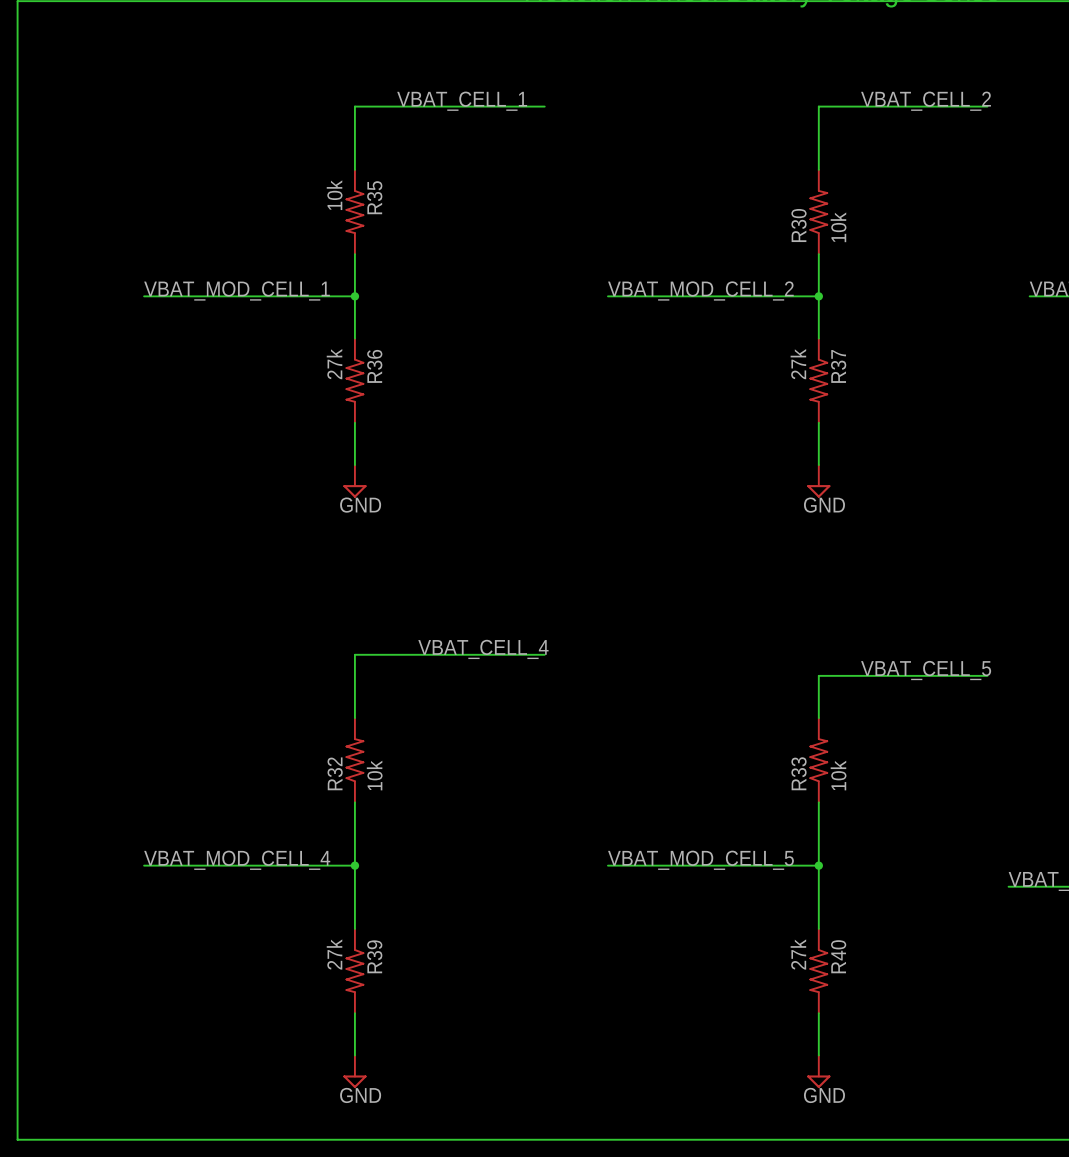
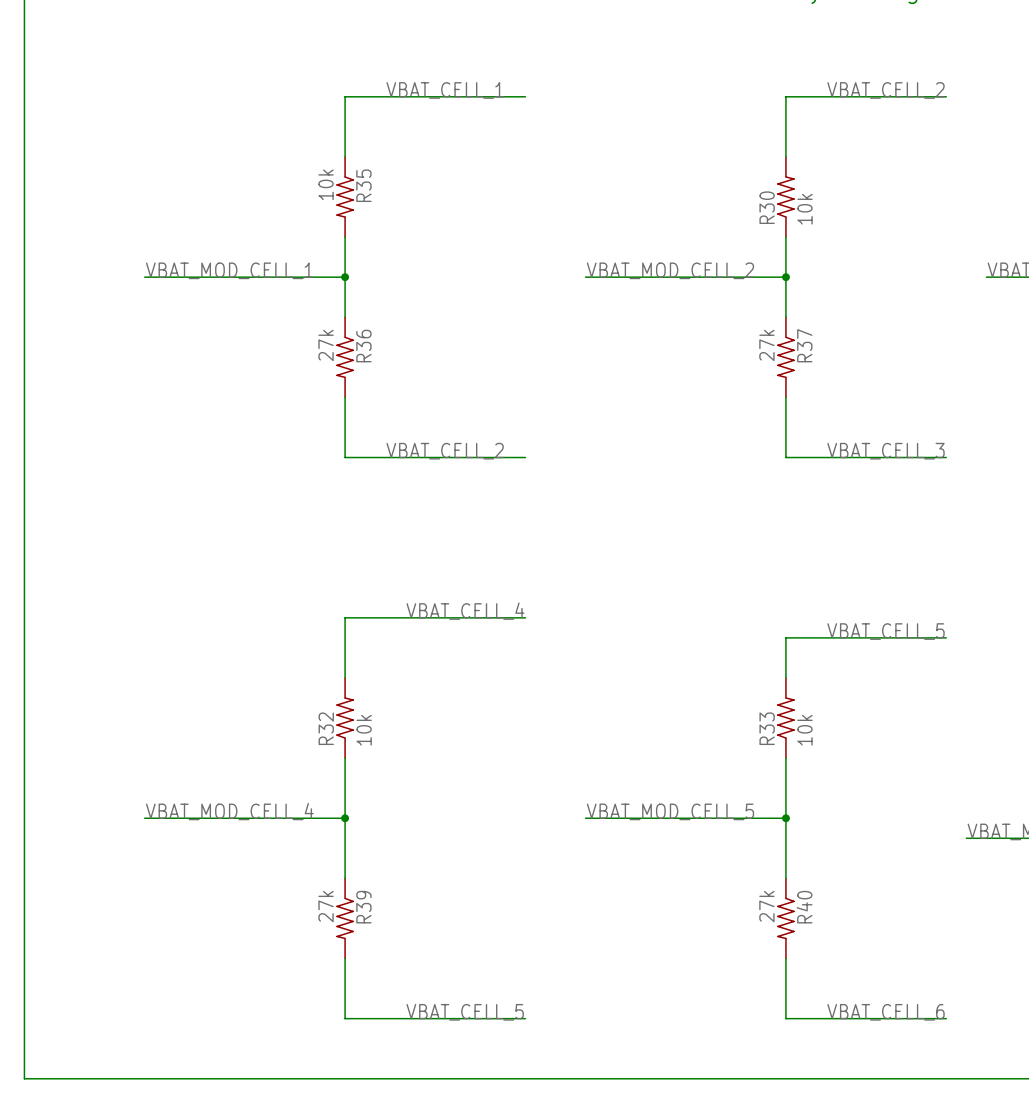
wire: none -> (345, 437) (345, 457) (525, 457)
wire: none -> (785, 437) (785, 457) (946, 457)
label: none -> VBAT_CELL_2 (445, 451)
label: none -> VBAT_CELL_3 (886, 451)
power symbol: GND (354, 481) -> none
power symbol: GND (818, 481) -> none
wire: none -> (345, 998) (345, 1018) (525, 1018)
wire: none -> (785, 998) (785, 1018) (946, 1018)
power symbol: GND (354, 1071) -> none
label: none -> VBAT_CELL_5 (465, 1012)
power symbol: GND (818, 1071) -> none
label: none -> VBAT_CELL_6 (886, 1012)

